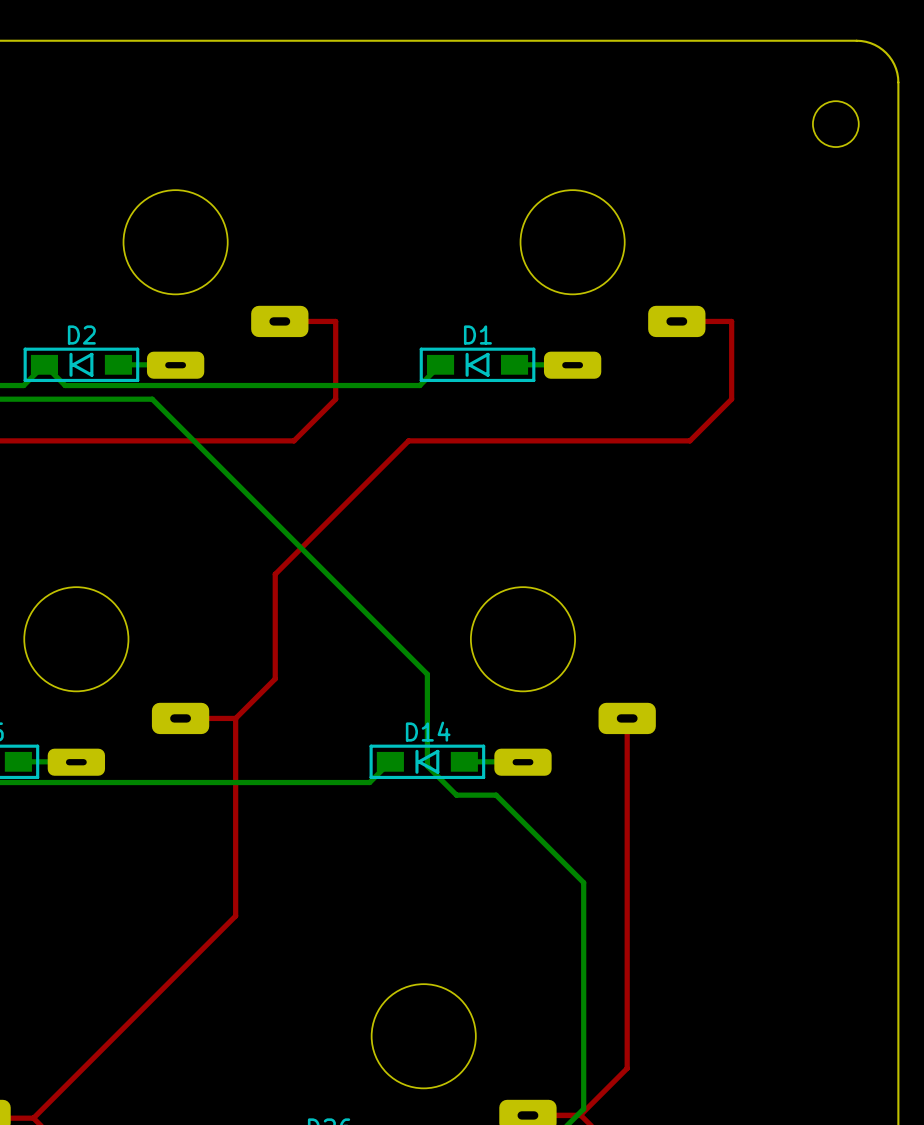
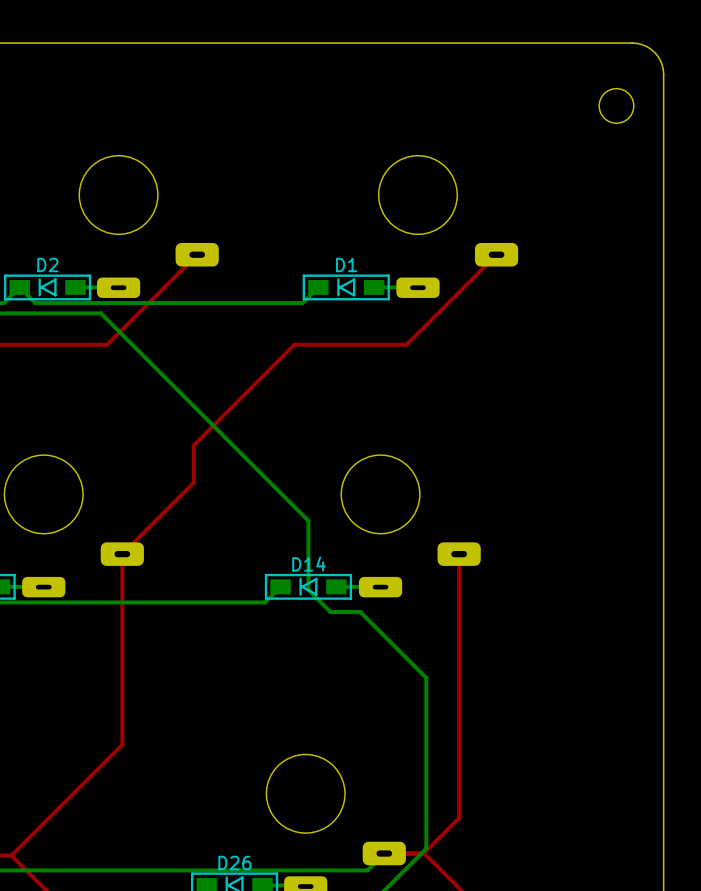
top track: (279, 321) (335, 321) (335, 399) (294, 440) (160, 440) -> (197, 254) (107, 344)
top track: (676, 321) (731, 321) (731, 399) (689, 440) (557, 440) -> (496, 254) (406, 344)
top track: (275, 623) (275, 678) (235, 718) -> none
top track: (235, 718) (235, 916) (180, 971) -> (193, 482) (122, 554) (122, 744)
top track: (235, 718) (180, 718) -> none

